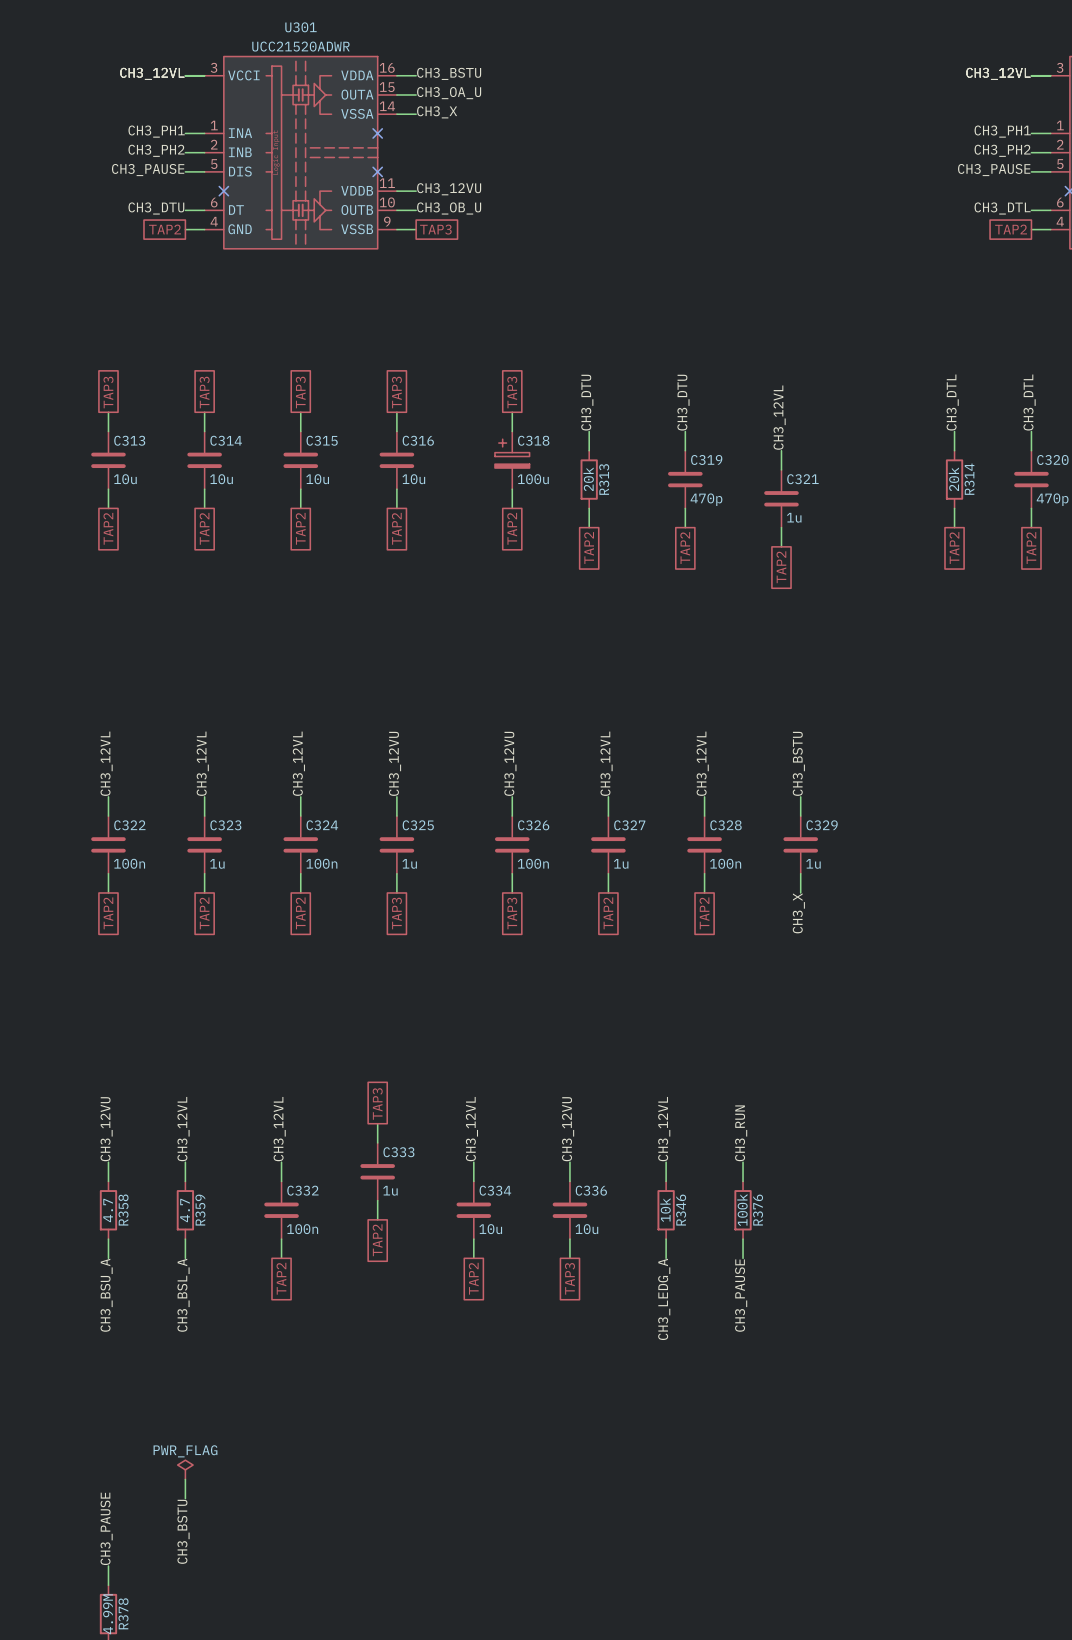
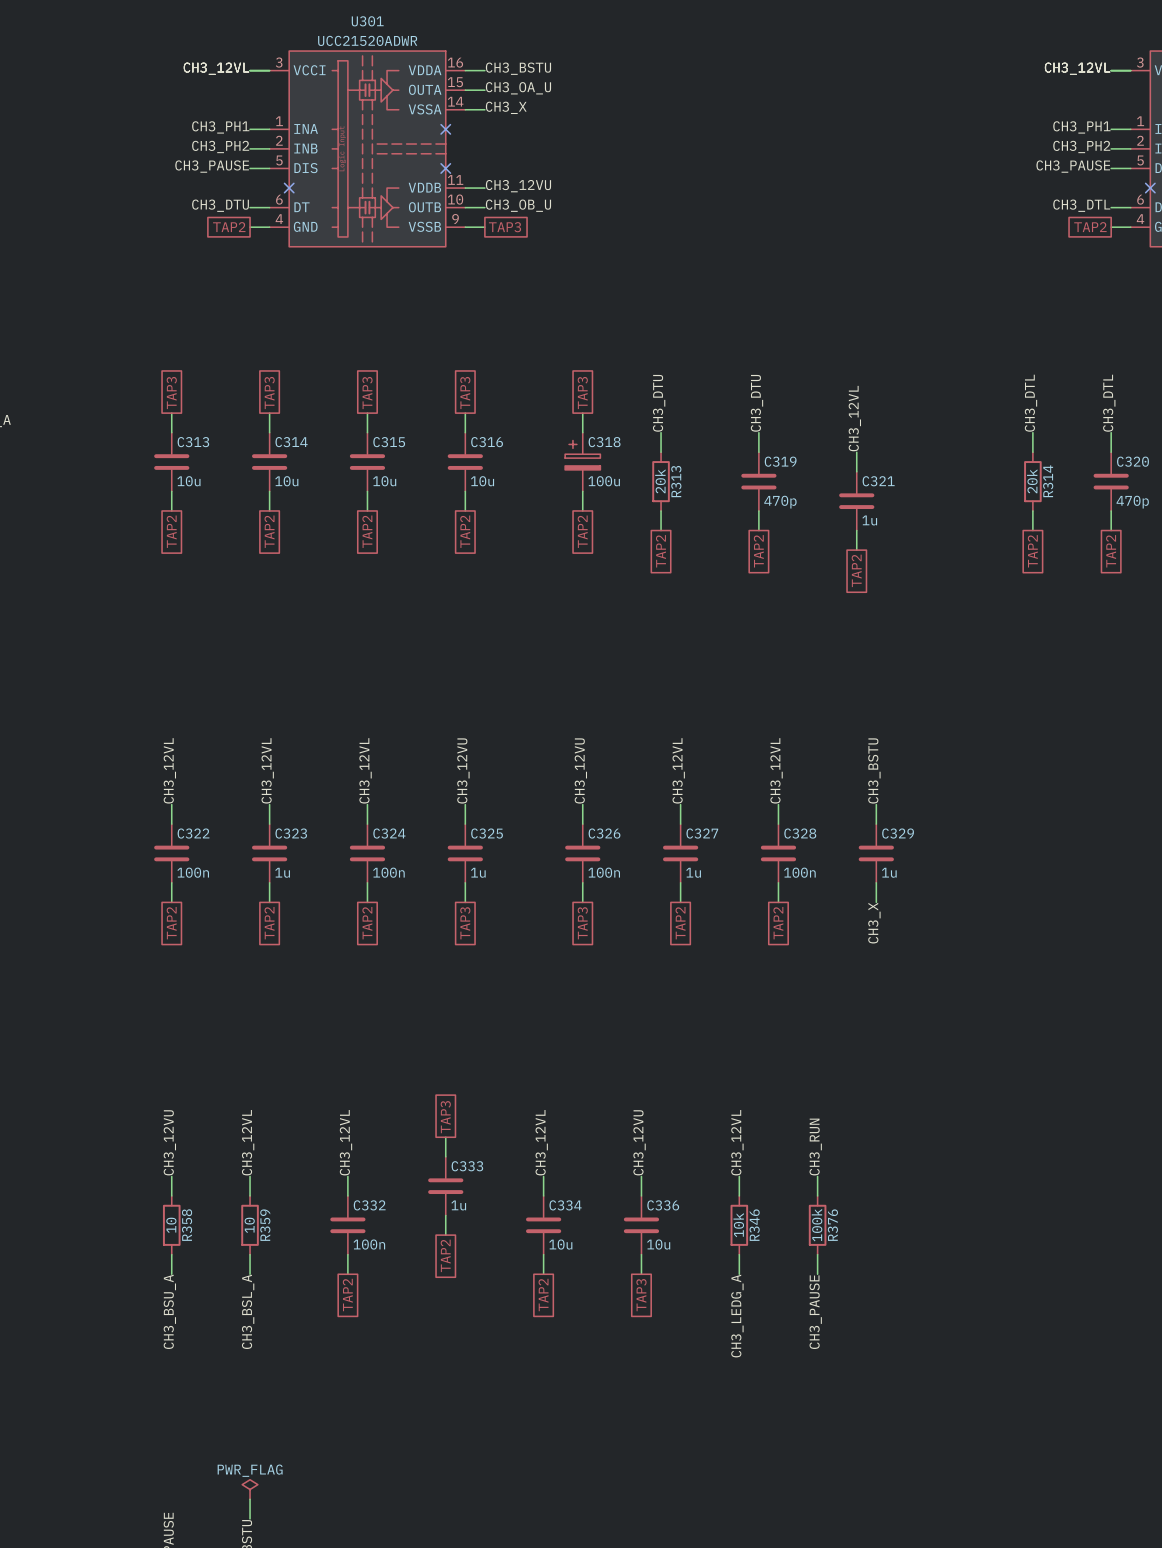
R358 value: 4.7 (108, 1210) -> 10 (171, 1225)
R359 value: 4.7 (185, 1210) -> 10 (249, 1225)

